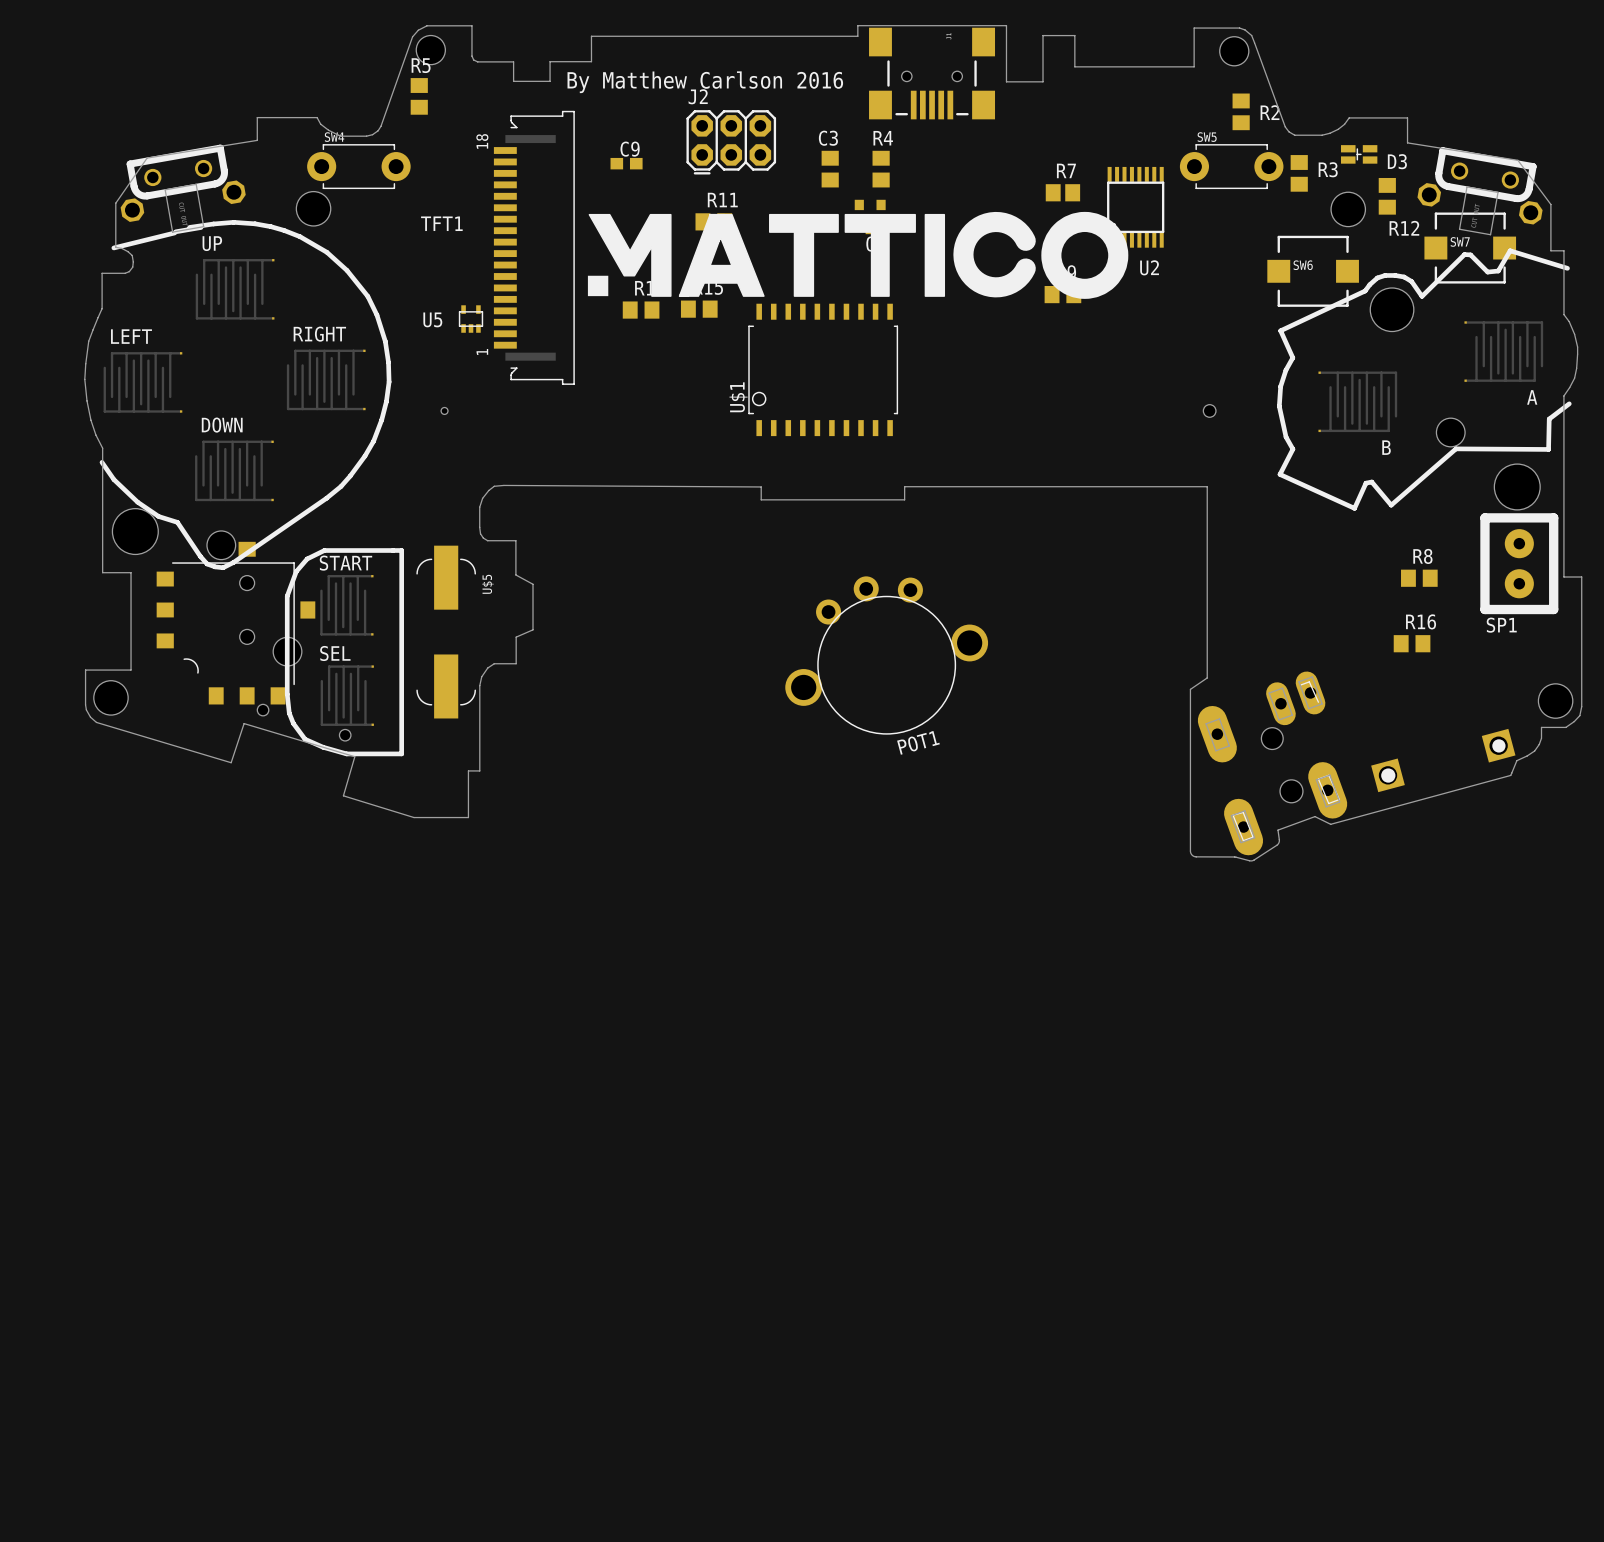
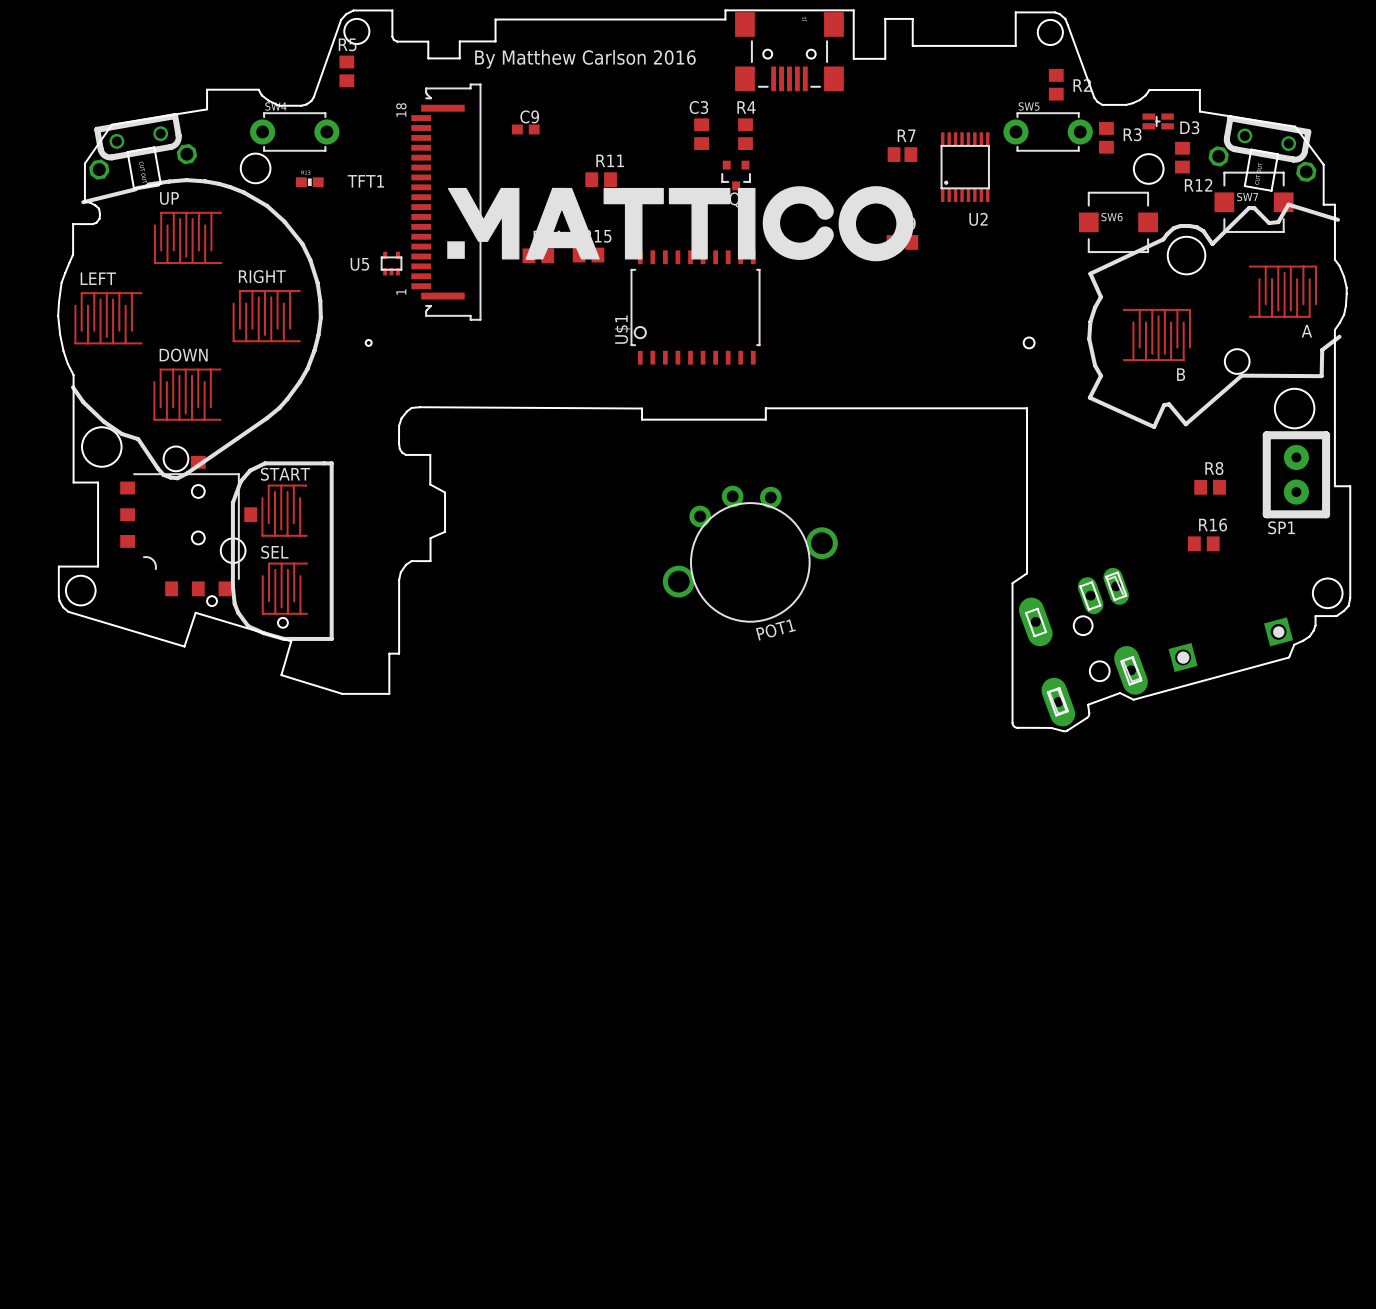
J2: (731, 142) -> none
part: none -> (309, 182)
drawing position: (858, 255) -> (680, 223)
U$5: (446, 632) -> none

